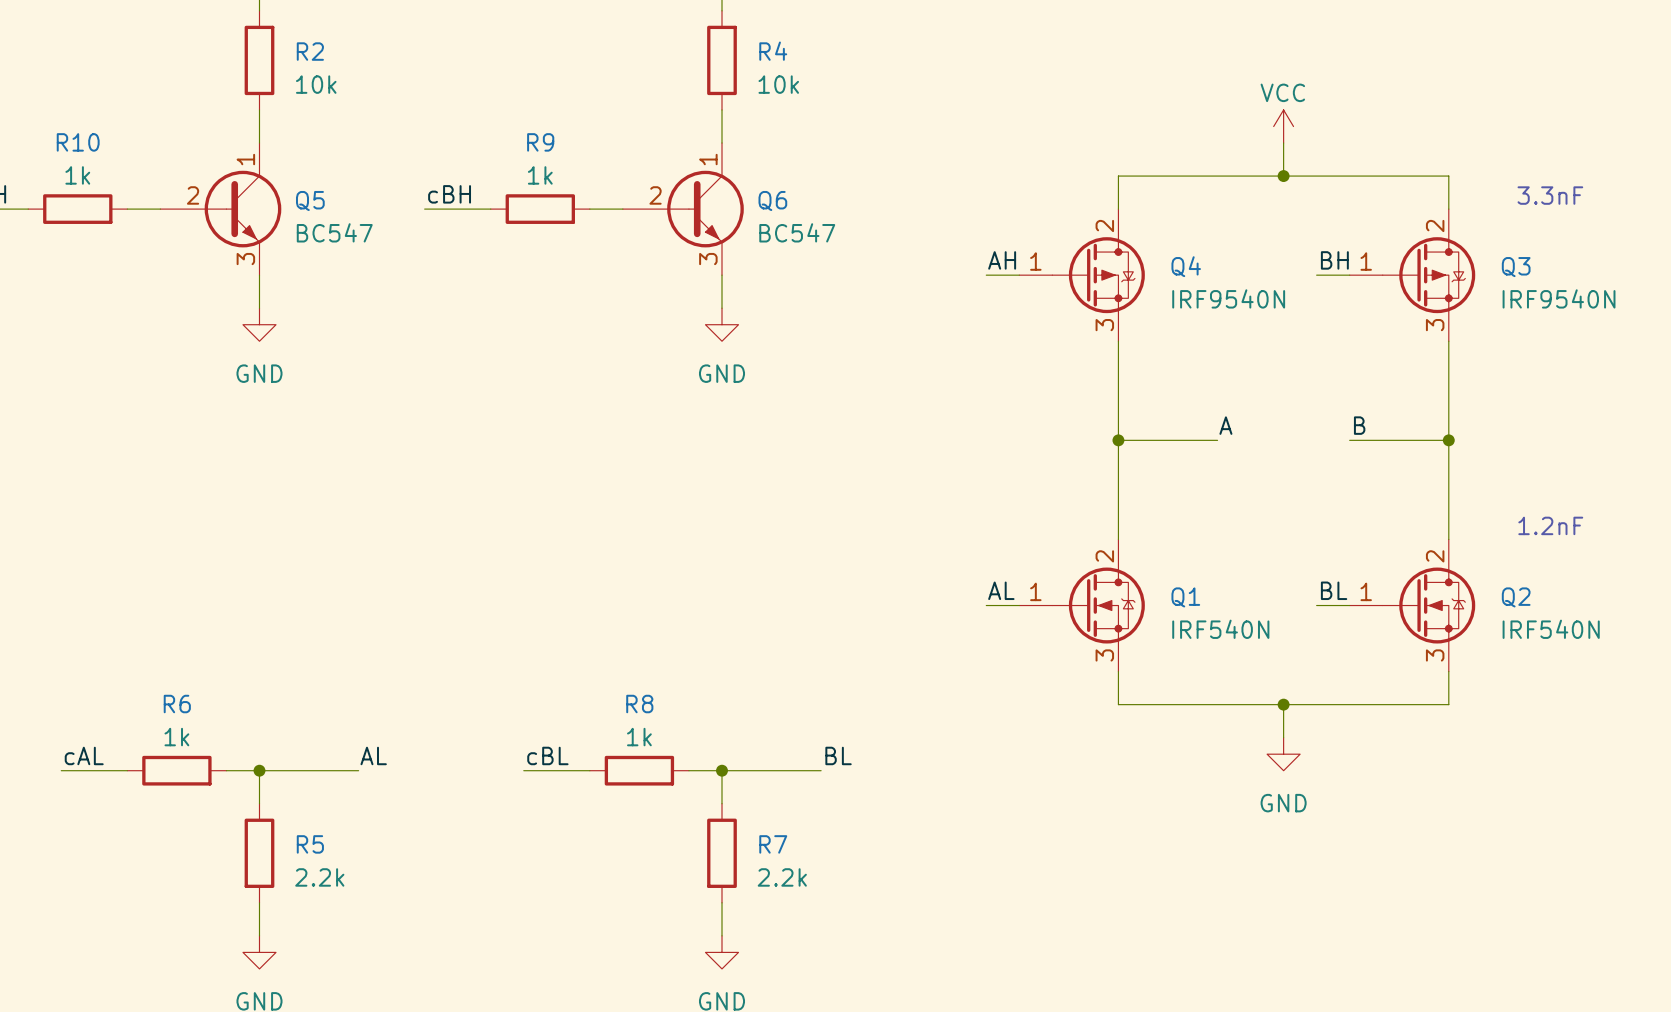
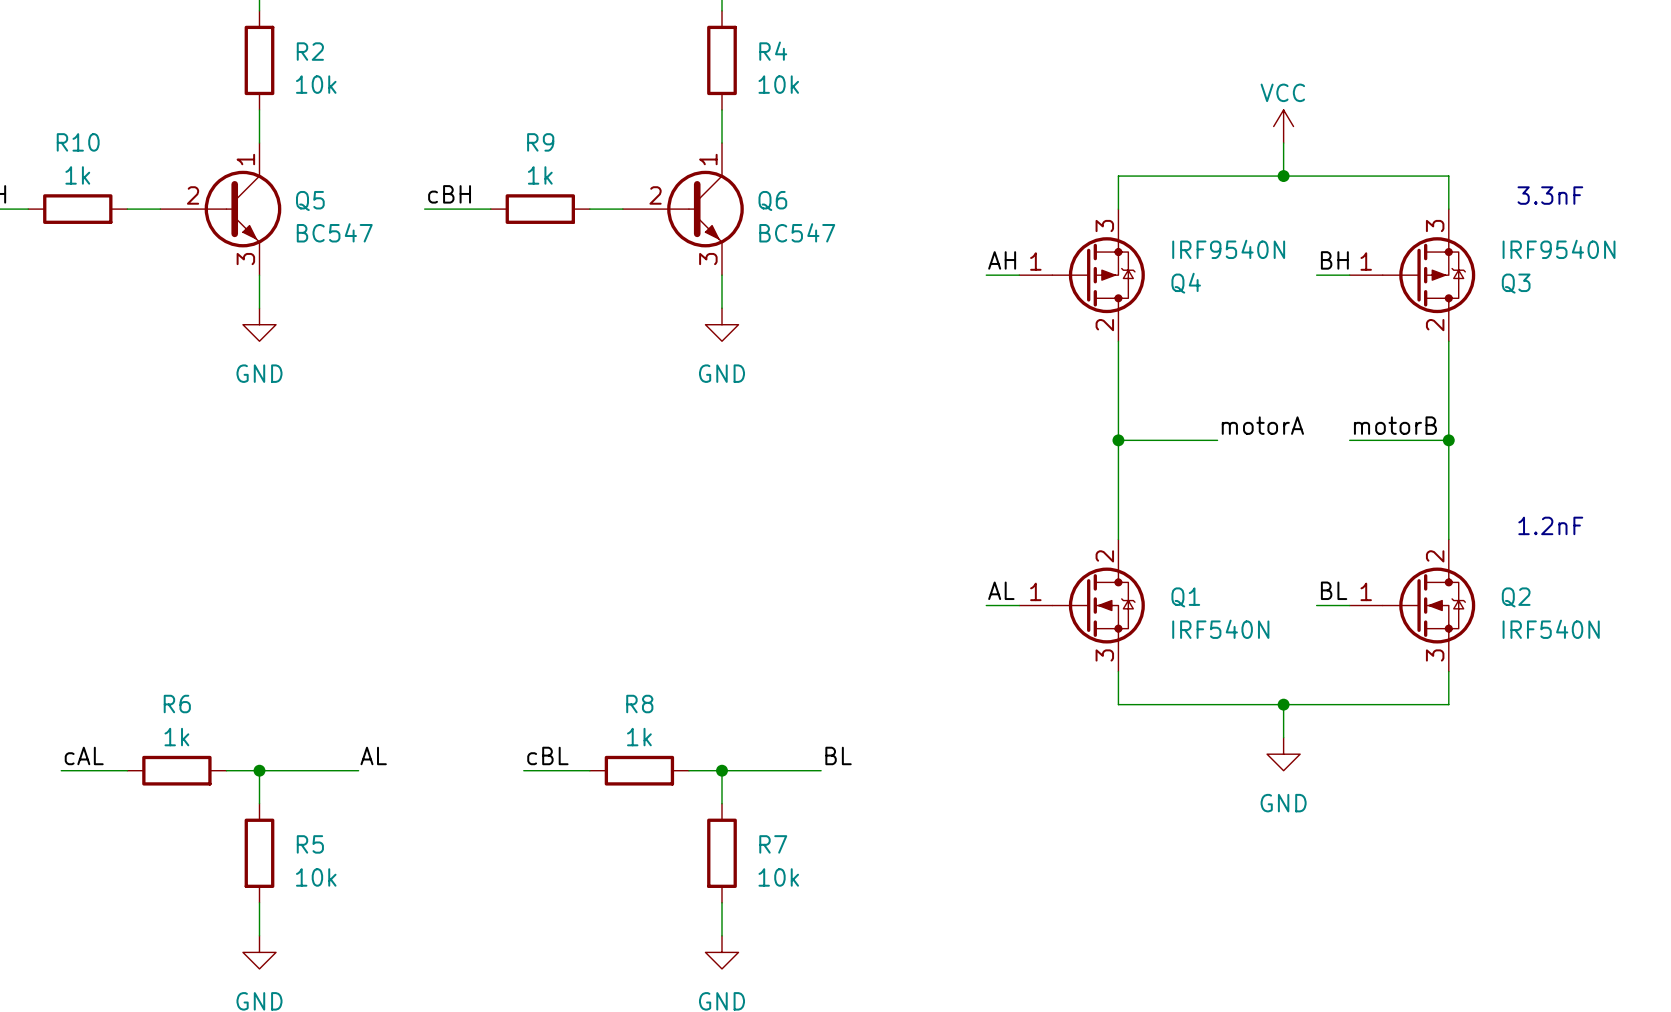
Q4 flip: as is (1098, 275) -> up-down (1098, 275)
Q3 flip: as is (1428, 275) -> up-down (1428, 275)
label: A (1225, 425) -> motorA (1262, 425)
label: B (1359, 425) -> motorB (1395, 425)
R5 value: 2.2k (319, 877) -> 10k (316, 877)
R7 value: 2.2k (782, 877) -> 10k (778, 877)

